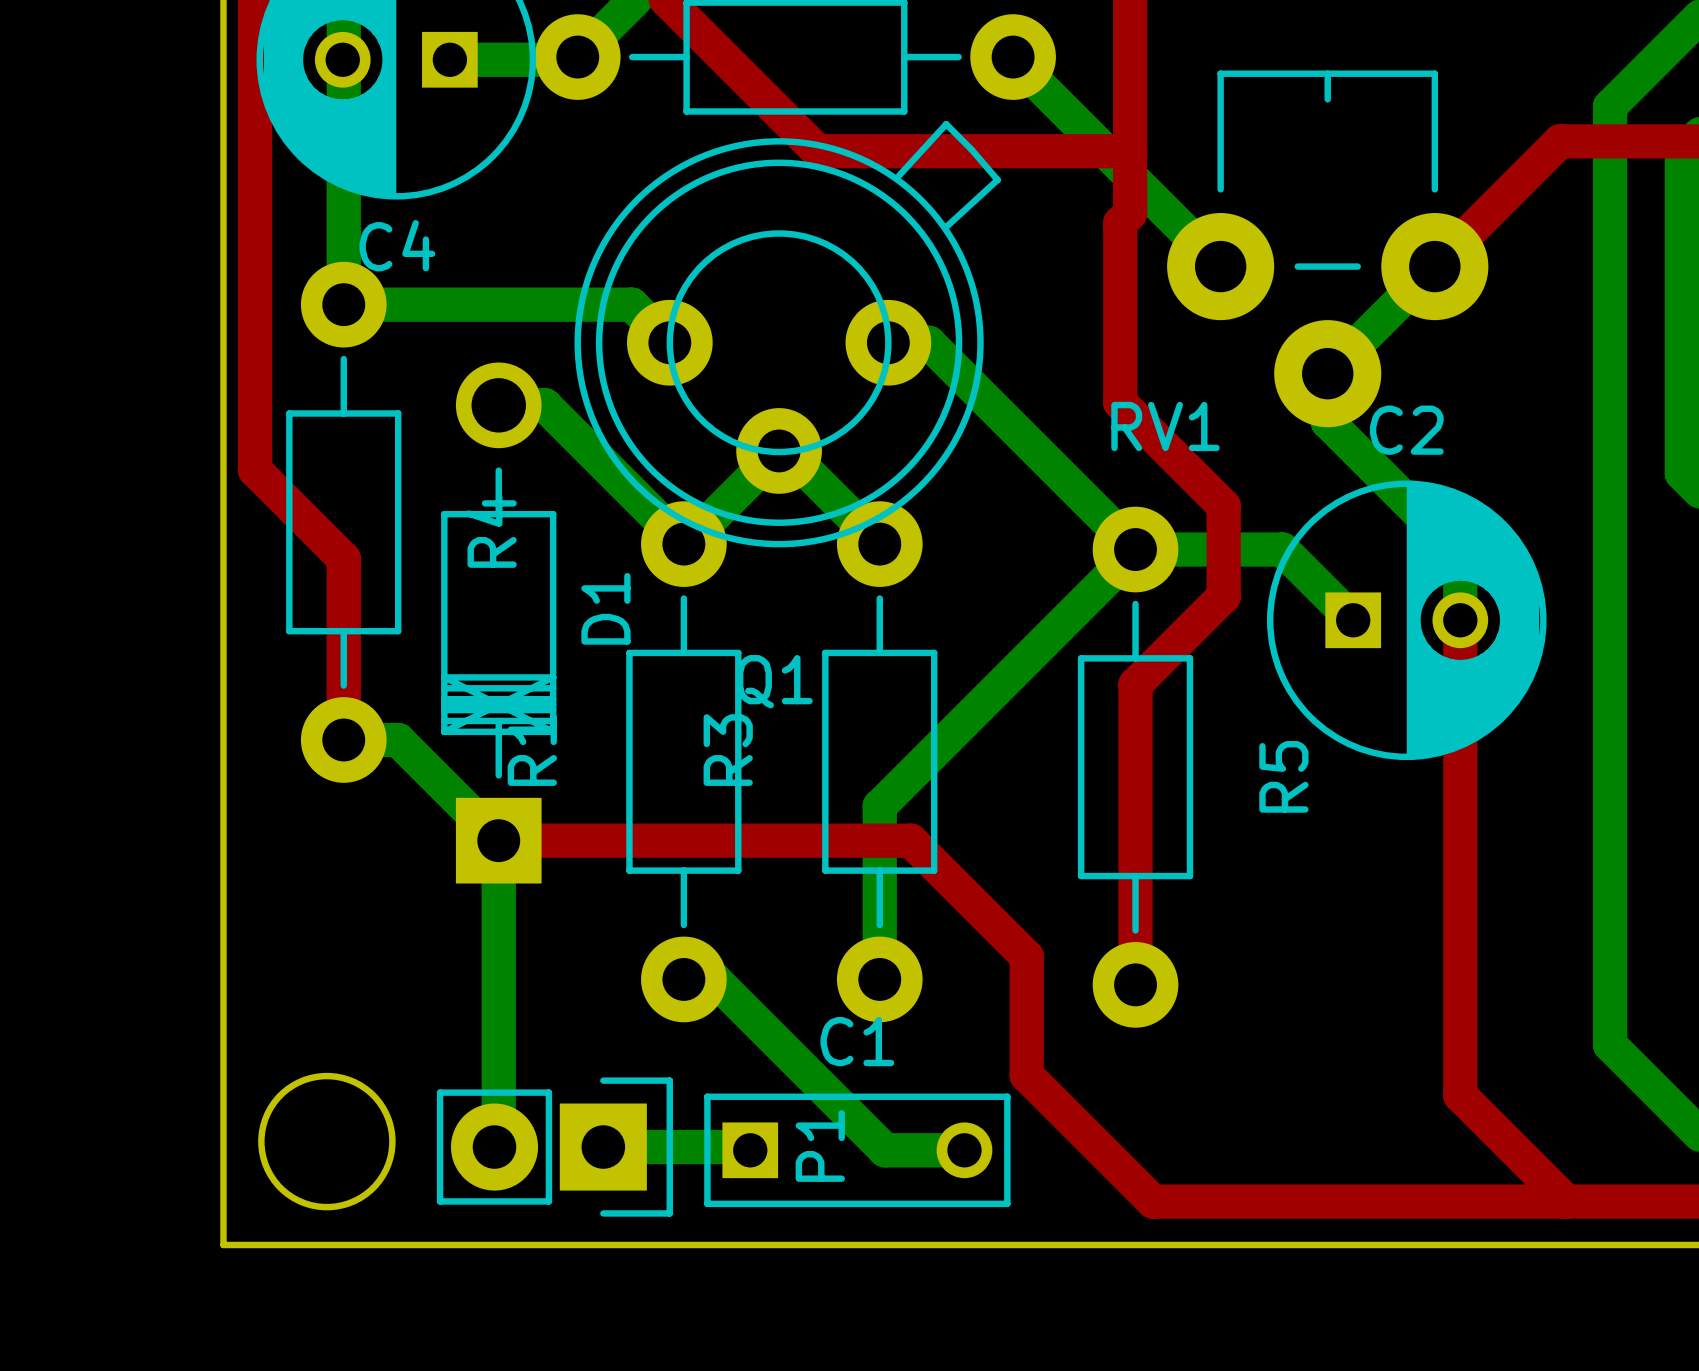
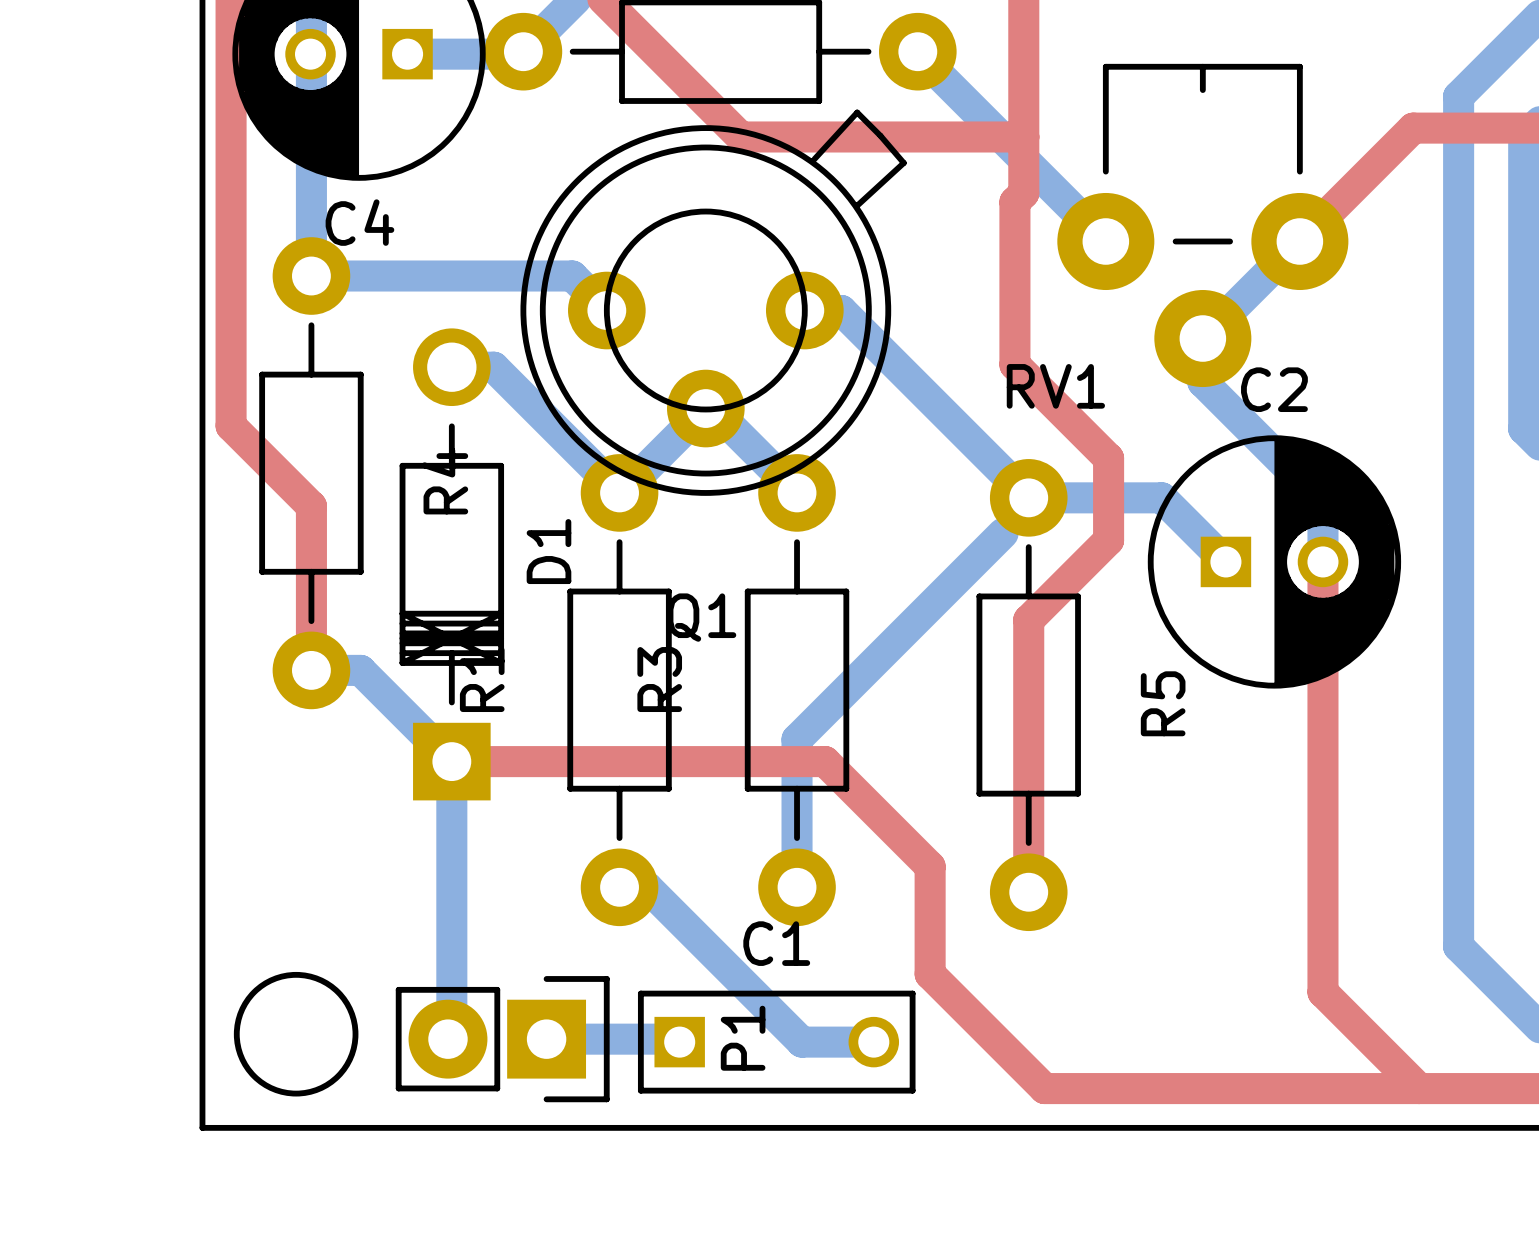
bottom track: (1135, 549) (879, 806) (879, 816) -> (1003, 533) (797, 739)

